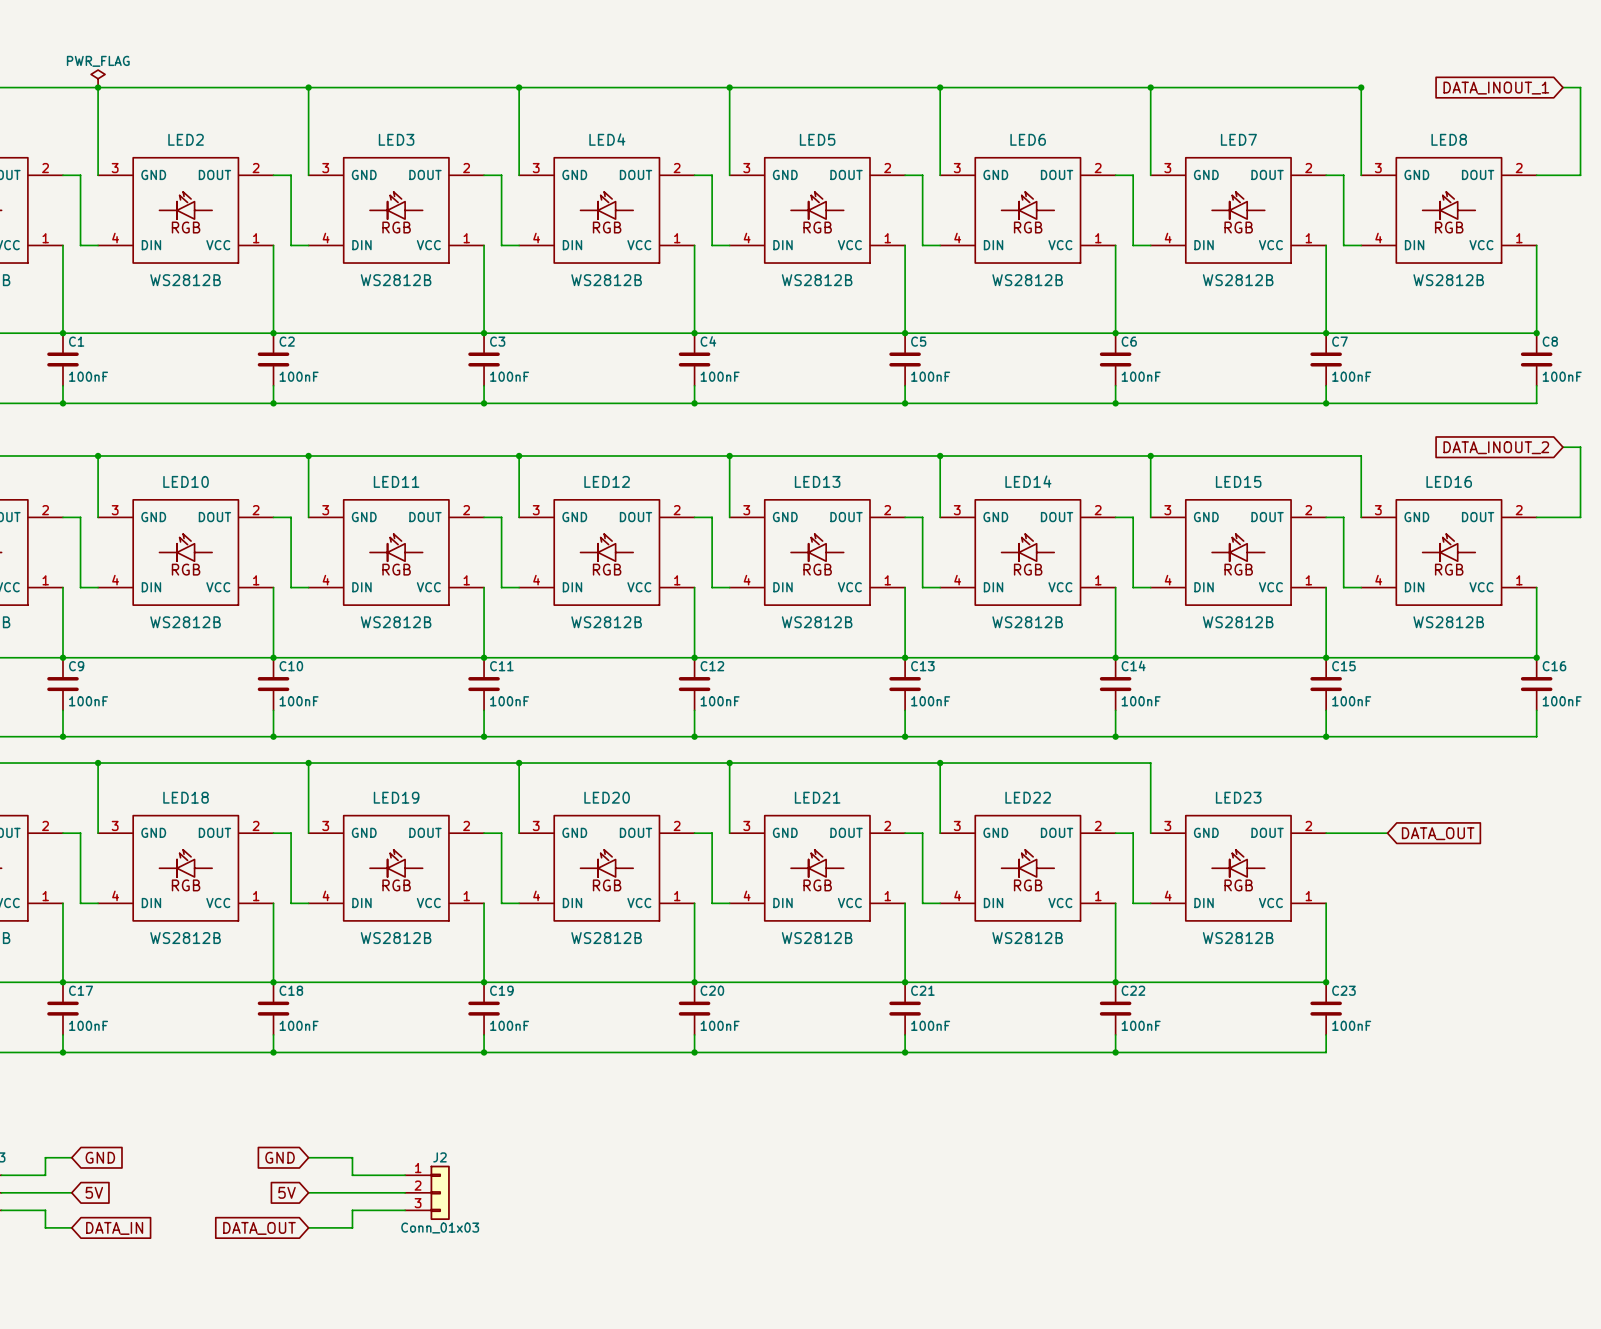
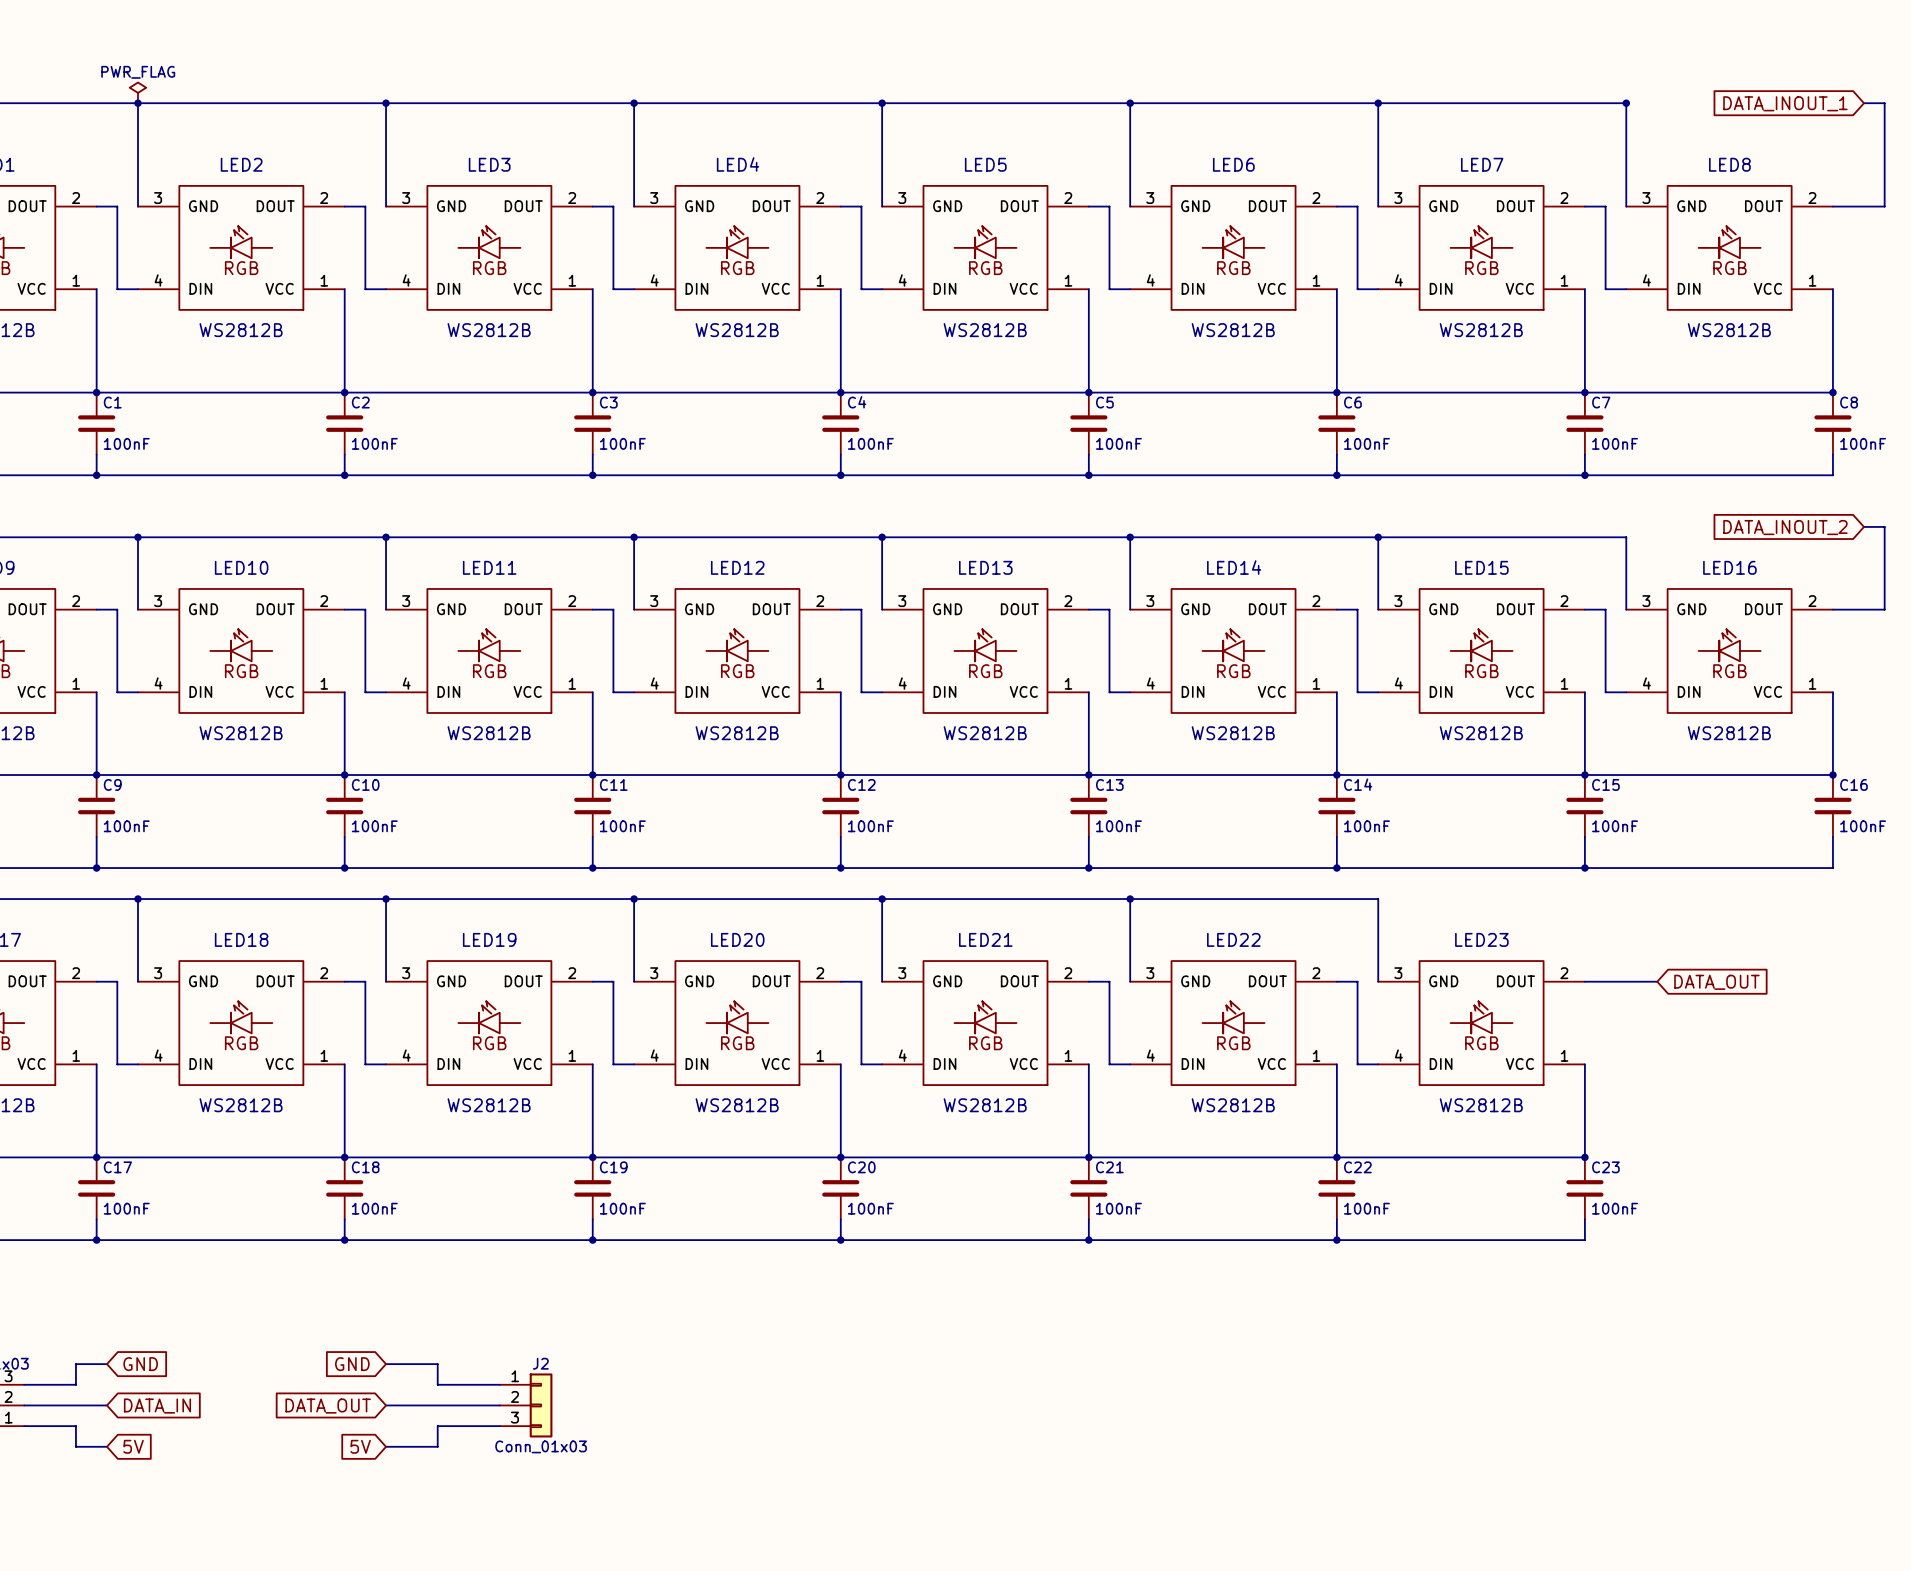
global label: 5V (94, 1192) -> DATA_IN (157, 1406)
global label: 5V (287, 1192) -> DATA_OUT (328, 1406)
global label: DATA_IN (114, 1228) -> 5V (133, 1446)
global label: DATA_OUT (259, 1228) -> 5V (360, 1446)

